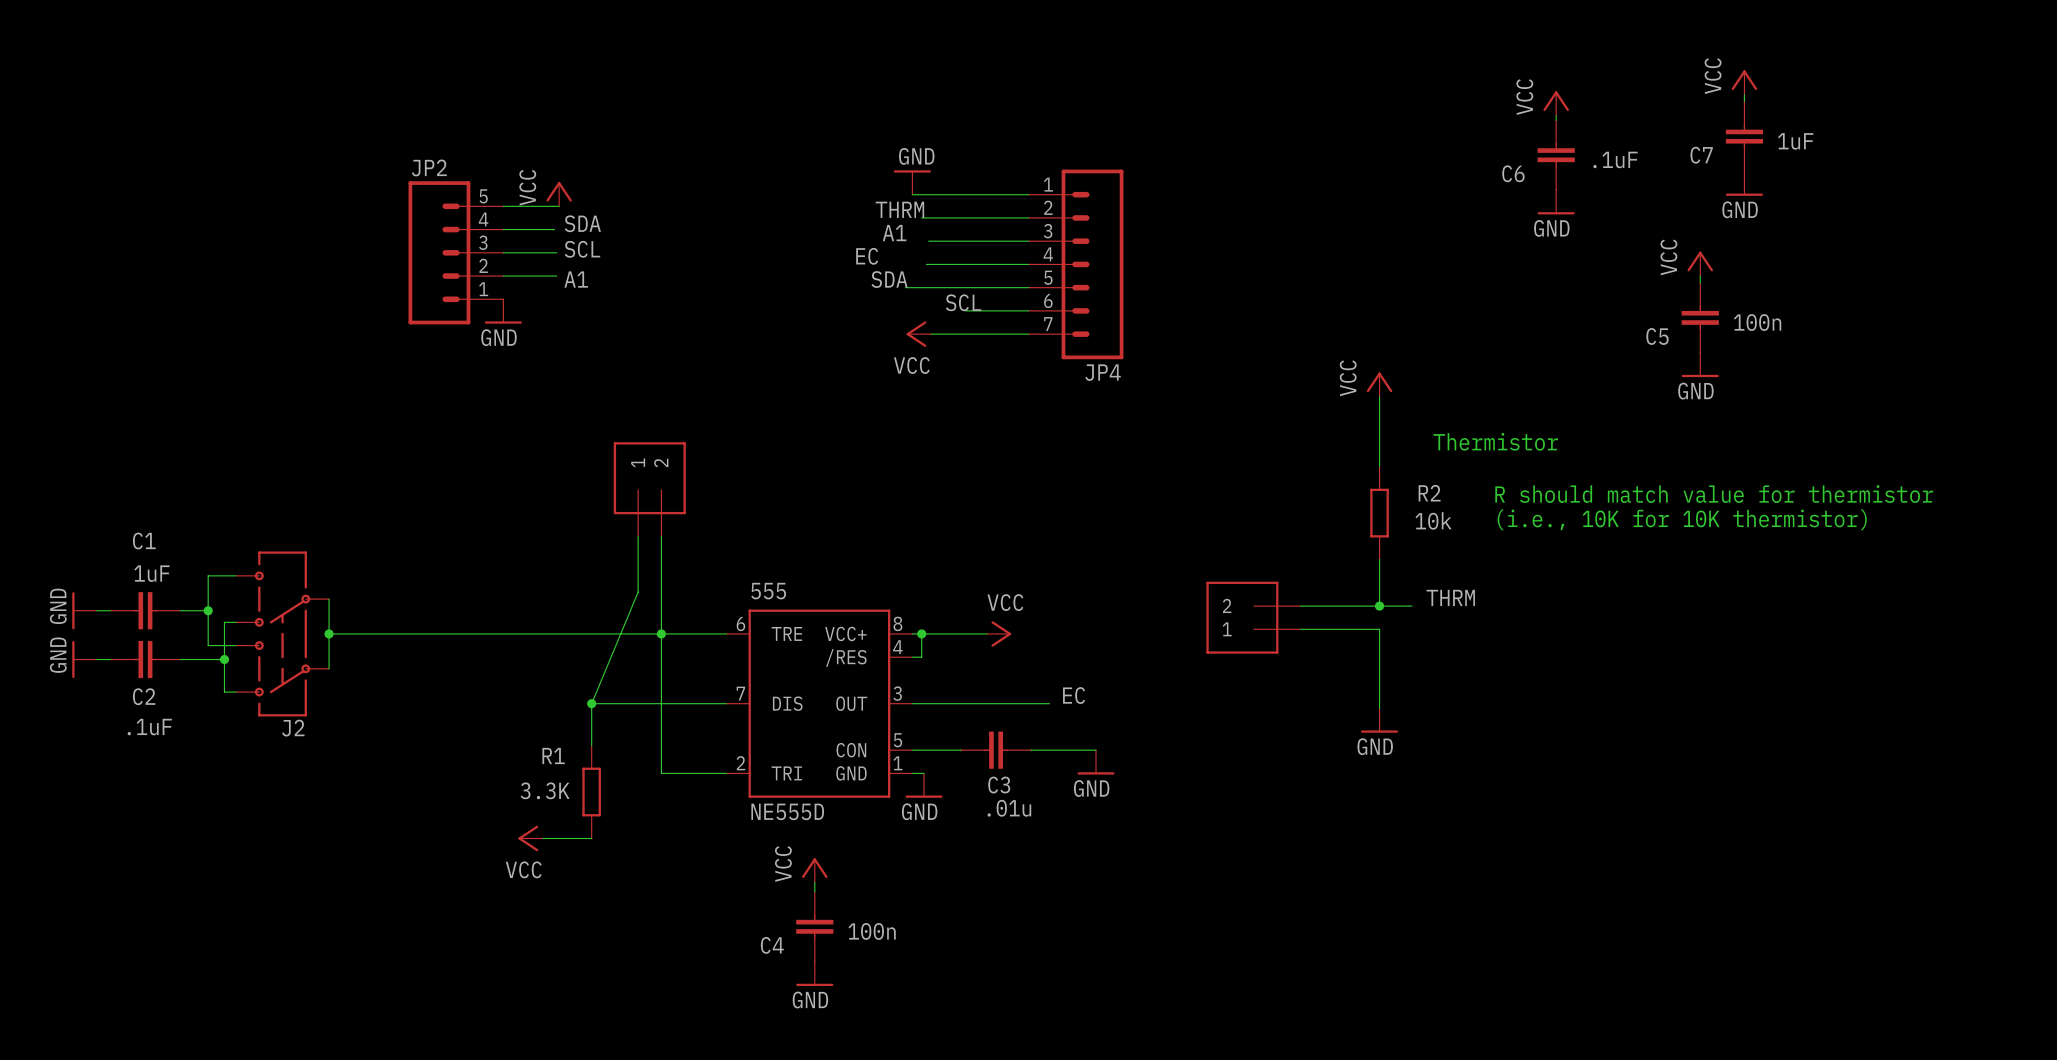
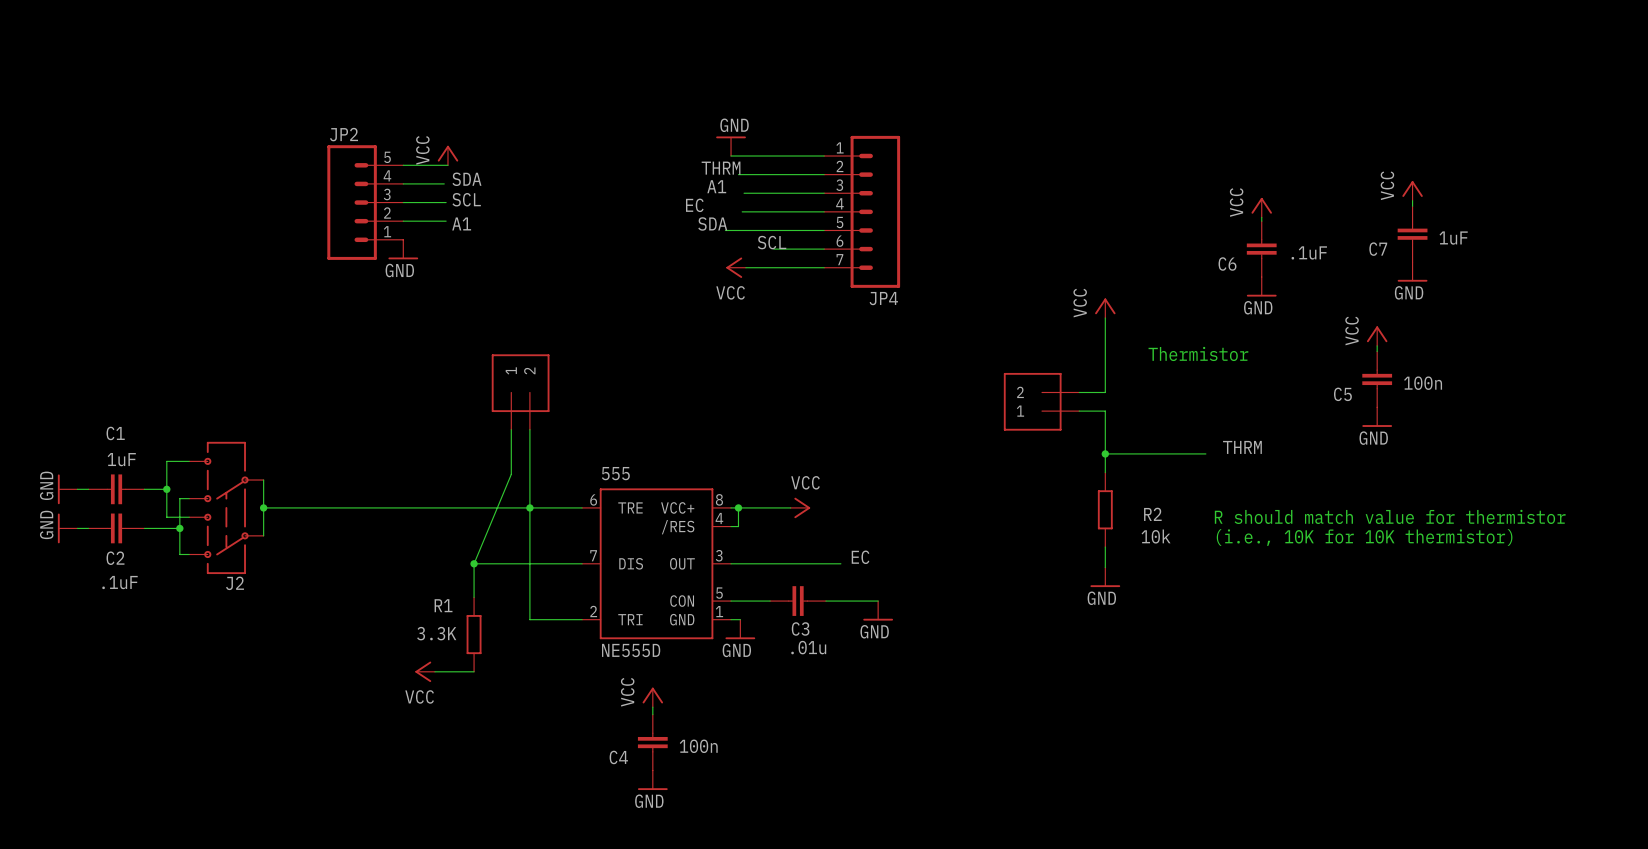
power symbol: VCC (1744, 82) -> none
wire: (1744, 94) (1744, 101) -> (1412, 200) (1412, 206)
power symbol: VCC (1556, 103) -> none
wire: (1556, 115) (1556, 120) -> (1261, 217) (1261, 221)
C7 position: (1744, 136) -> (1412, 234)
C6 position: (1556, 155) -> (1261, 249)
power symbol: GND (1744, 183) -> none
power symbol: GND (1556, 202) -> none
power symbol: none -> VCC (1412, 190)
power symbol: none -> VCC (1261, 207)
power symbol: VCC (1700, 263) -> none
wire: (1700, 276) (1700, 283) -> (1377, 345) (1377, 351)
C5 position: (1700, 317) -> (1377, 379)
power symbol: none -> GND (1412, 271)
power symbol: none -> GND (1261, 286)
power symbol: GND (1700, 364) -> none
power symbol: none -> VCC (1377, 336)
wire: none -> (1105, 373) (1105, 392) (1079, 392)
R2 name position: R2 (1429, 493) -> R2 (1152, 514)
text position: R should match value for thermistor (1714, 494) -> R should match value for thermistor (1390, 516)
wire: none -> (1079, 411) (1105, 411) (1105, 448)
R2 position: (1379, 513) -> (1105, 509)
text position: (i.e., 10K for 10K thermistor) (1682, 519) -> (i.e., 10K for 10K thermistor) (1364, 537)
R2 value position: 10k (1433, 520) -> 10k (1156, 536)
power symbol: none -> GND (1377, 417)
wire: none -> (1105, 453) (1205, 453)
label position: THRM (1450, 597) -> THRM (1242, 447)
wire: (1300, 606) (1412, 606) -> none
junction position: (1379, 606) -> (1105, 453)
part position: (1253, 617) -> (1041, 401)
wire: (1300, 629) (1379, 629) (1379, 682) -> none

